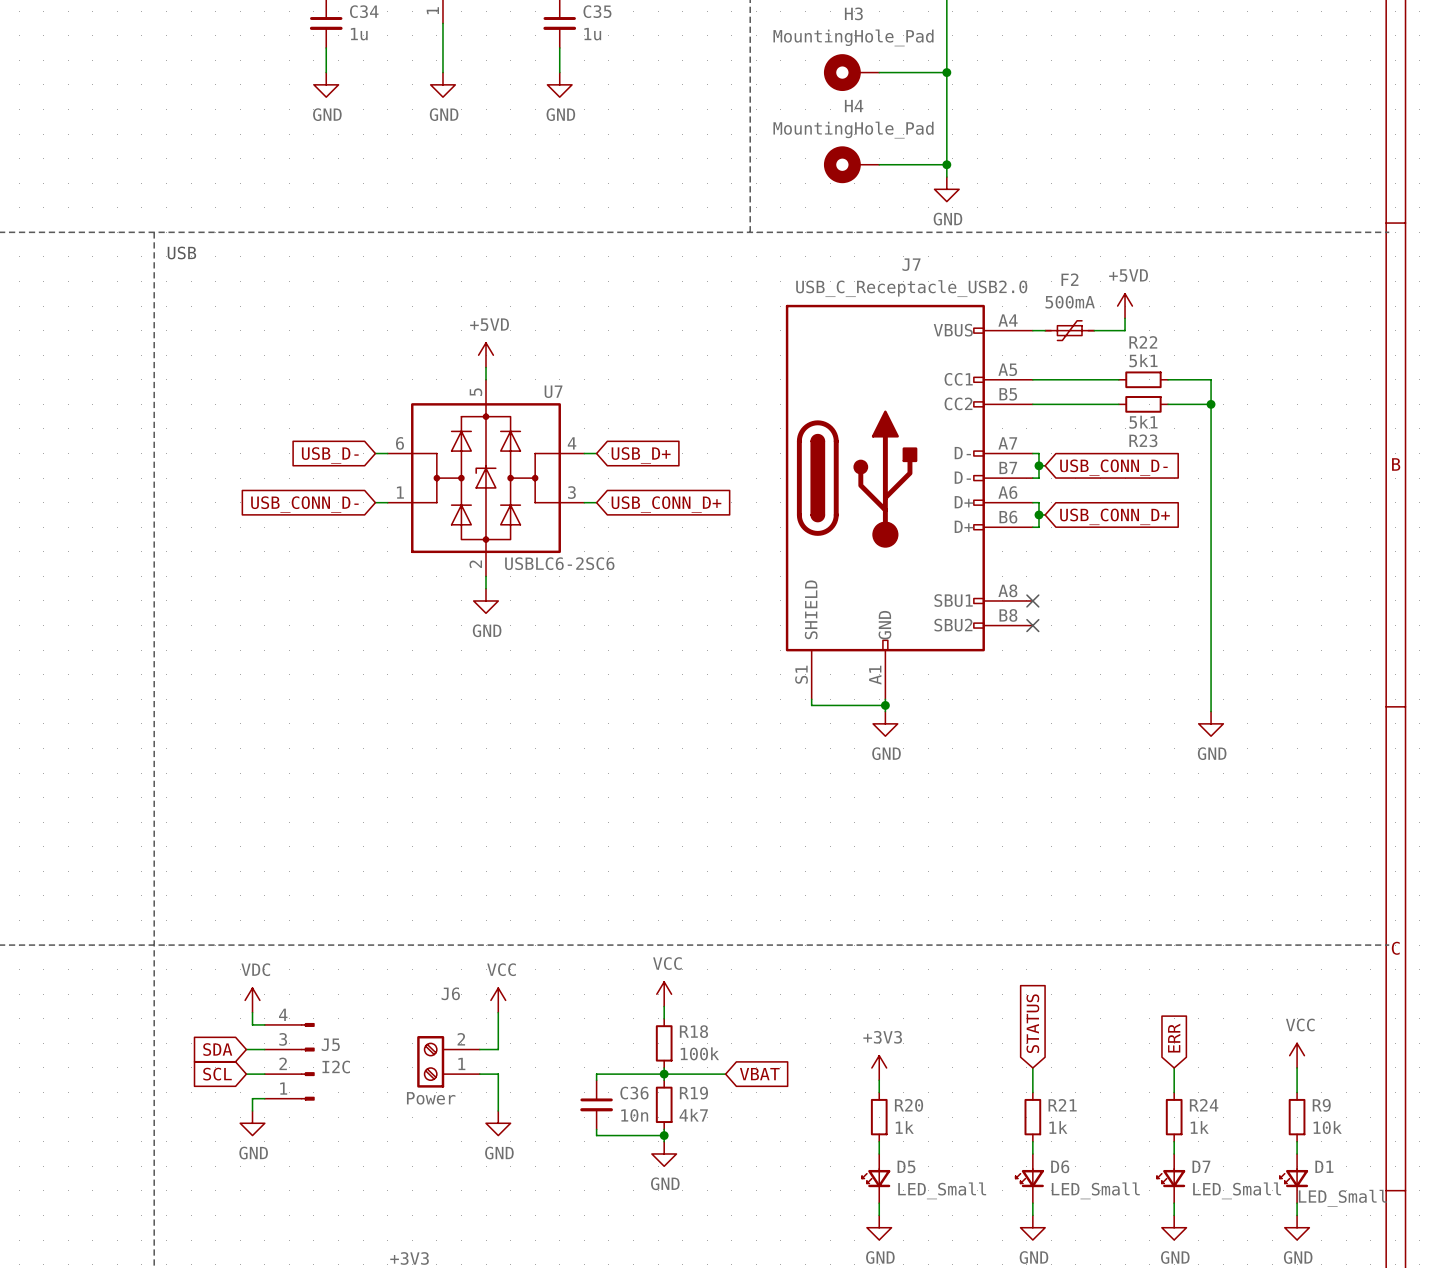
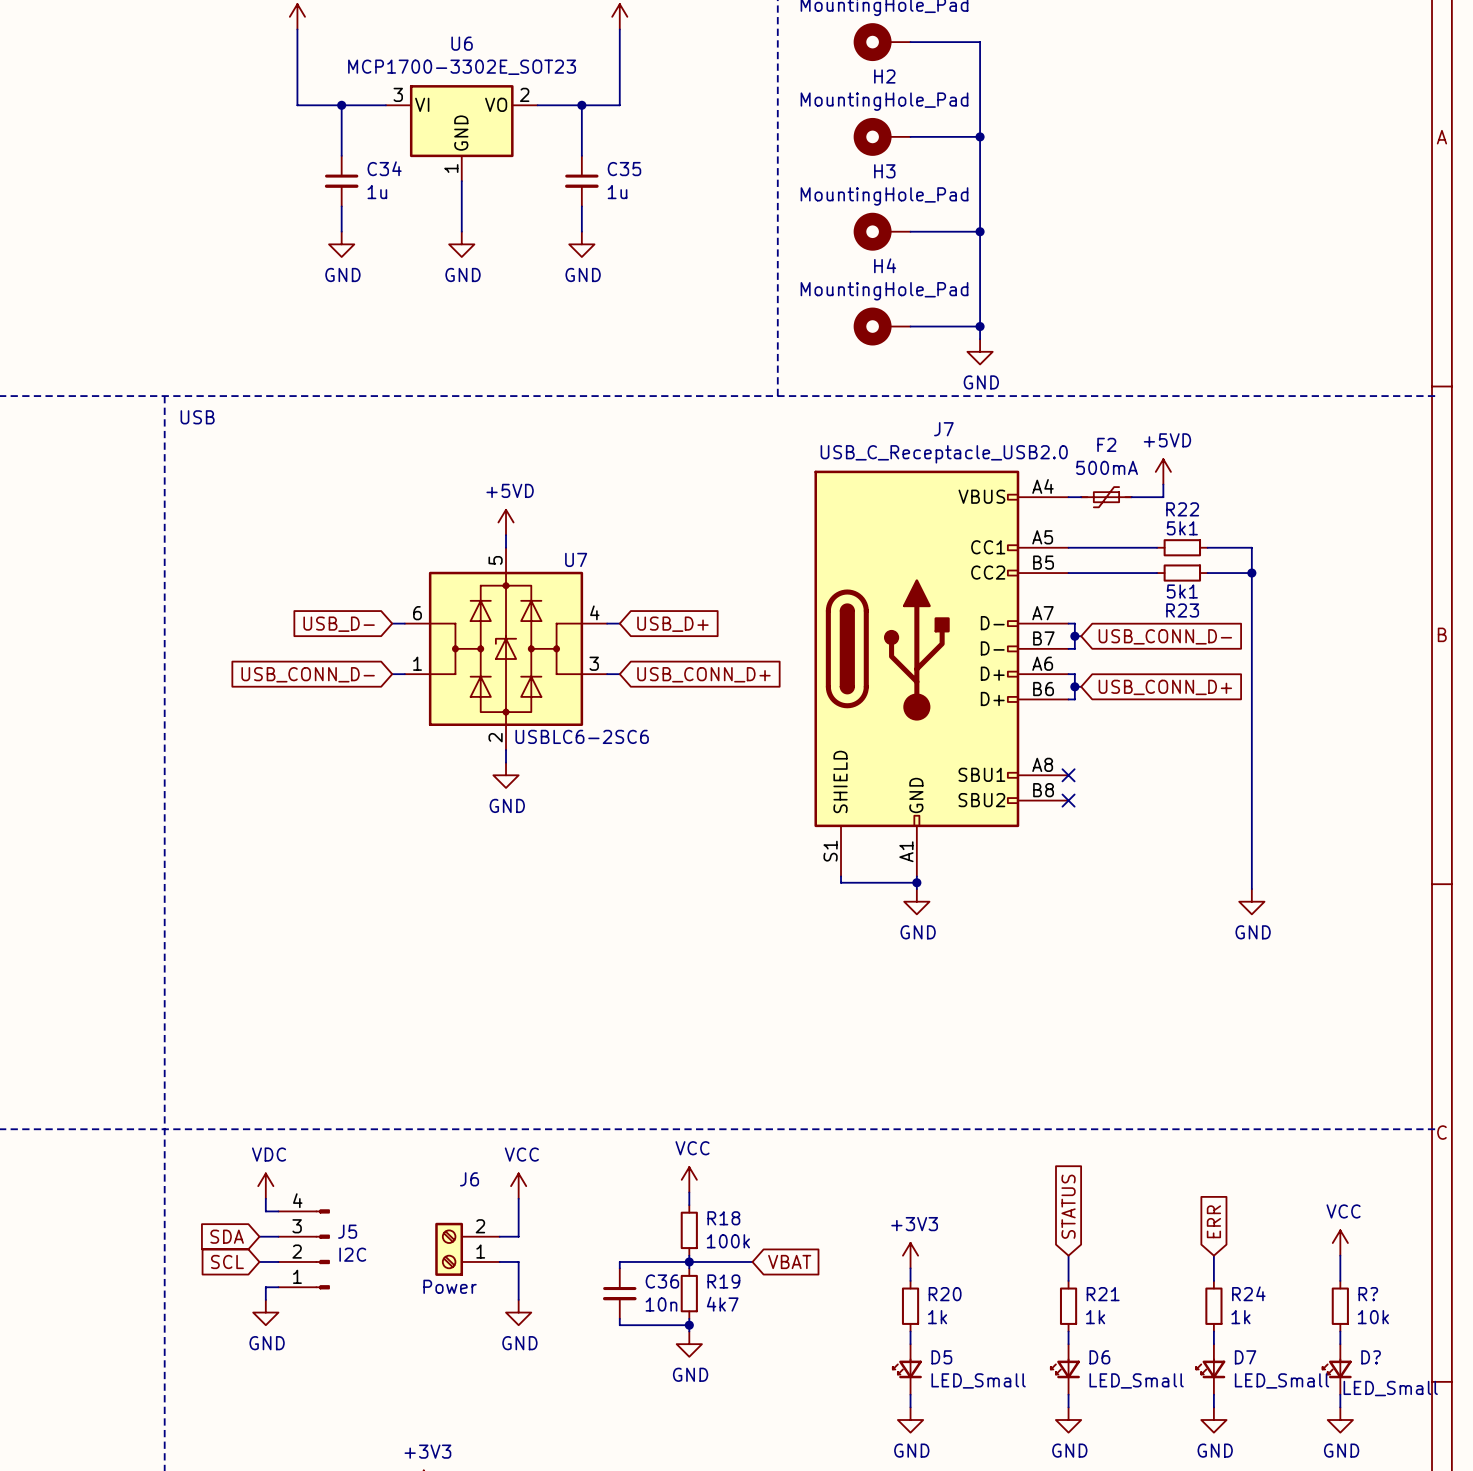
R9 name: R9 (1321, 1105) -> R? (1368, 1294)
D1 name: D1 (1324, 1166) -> D? (1371, 1357)

